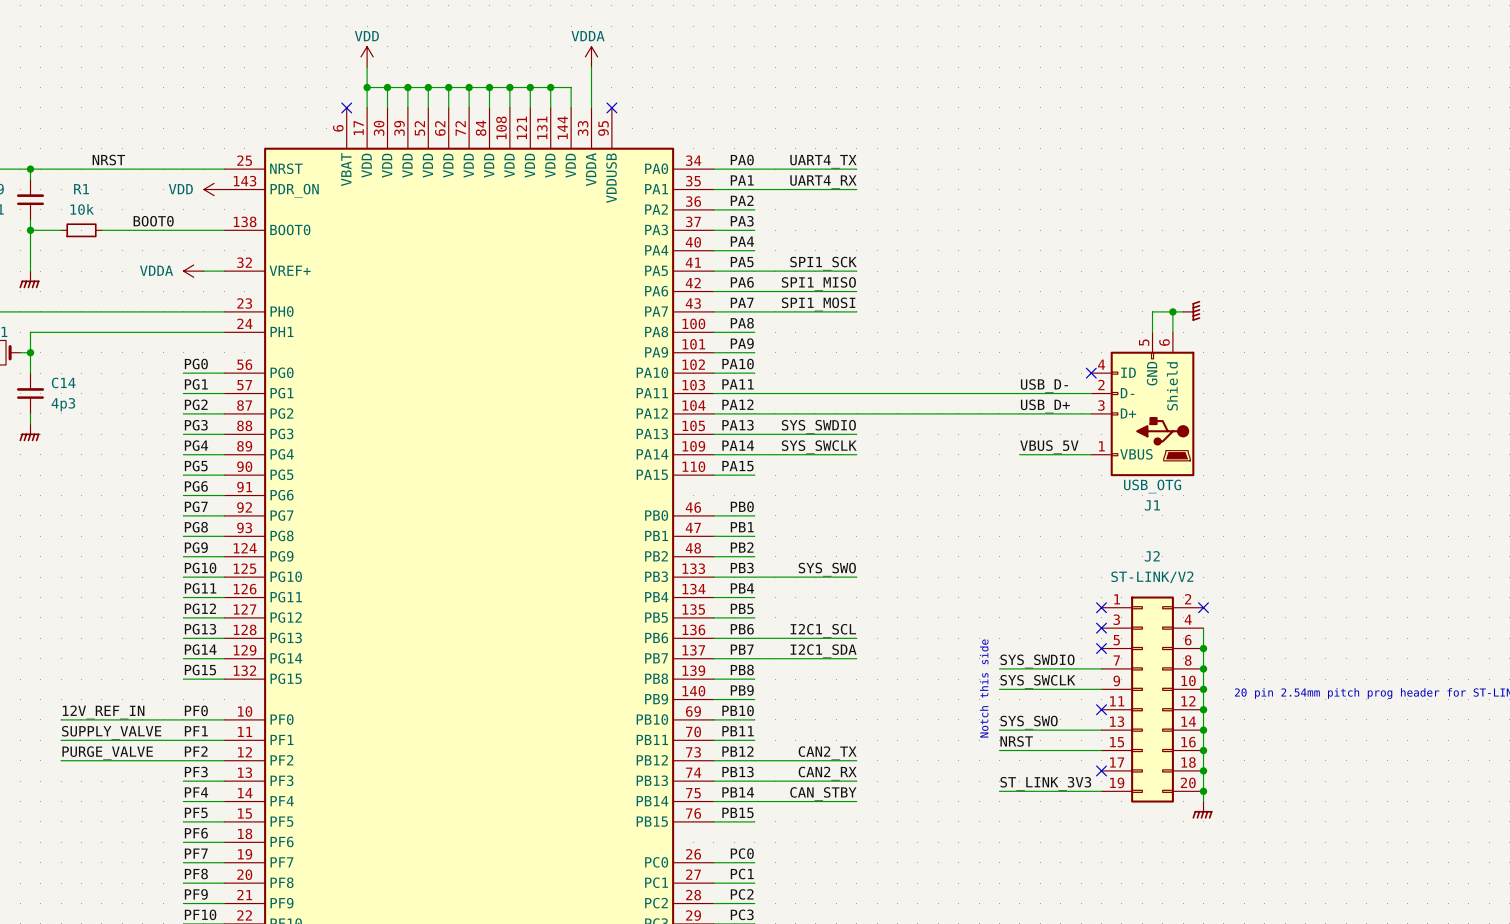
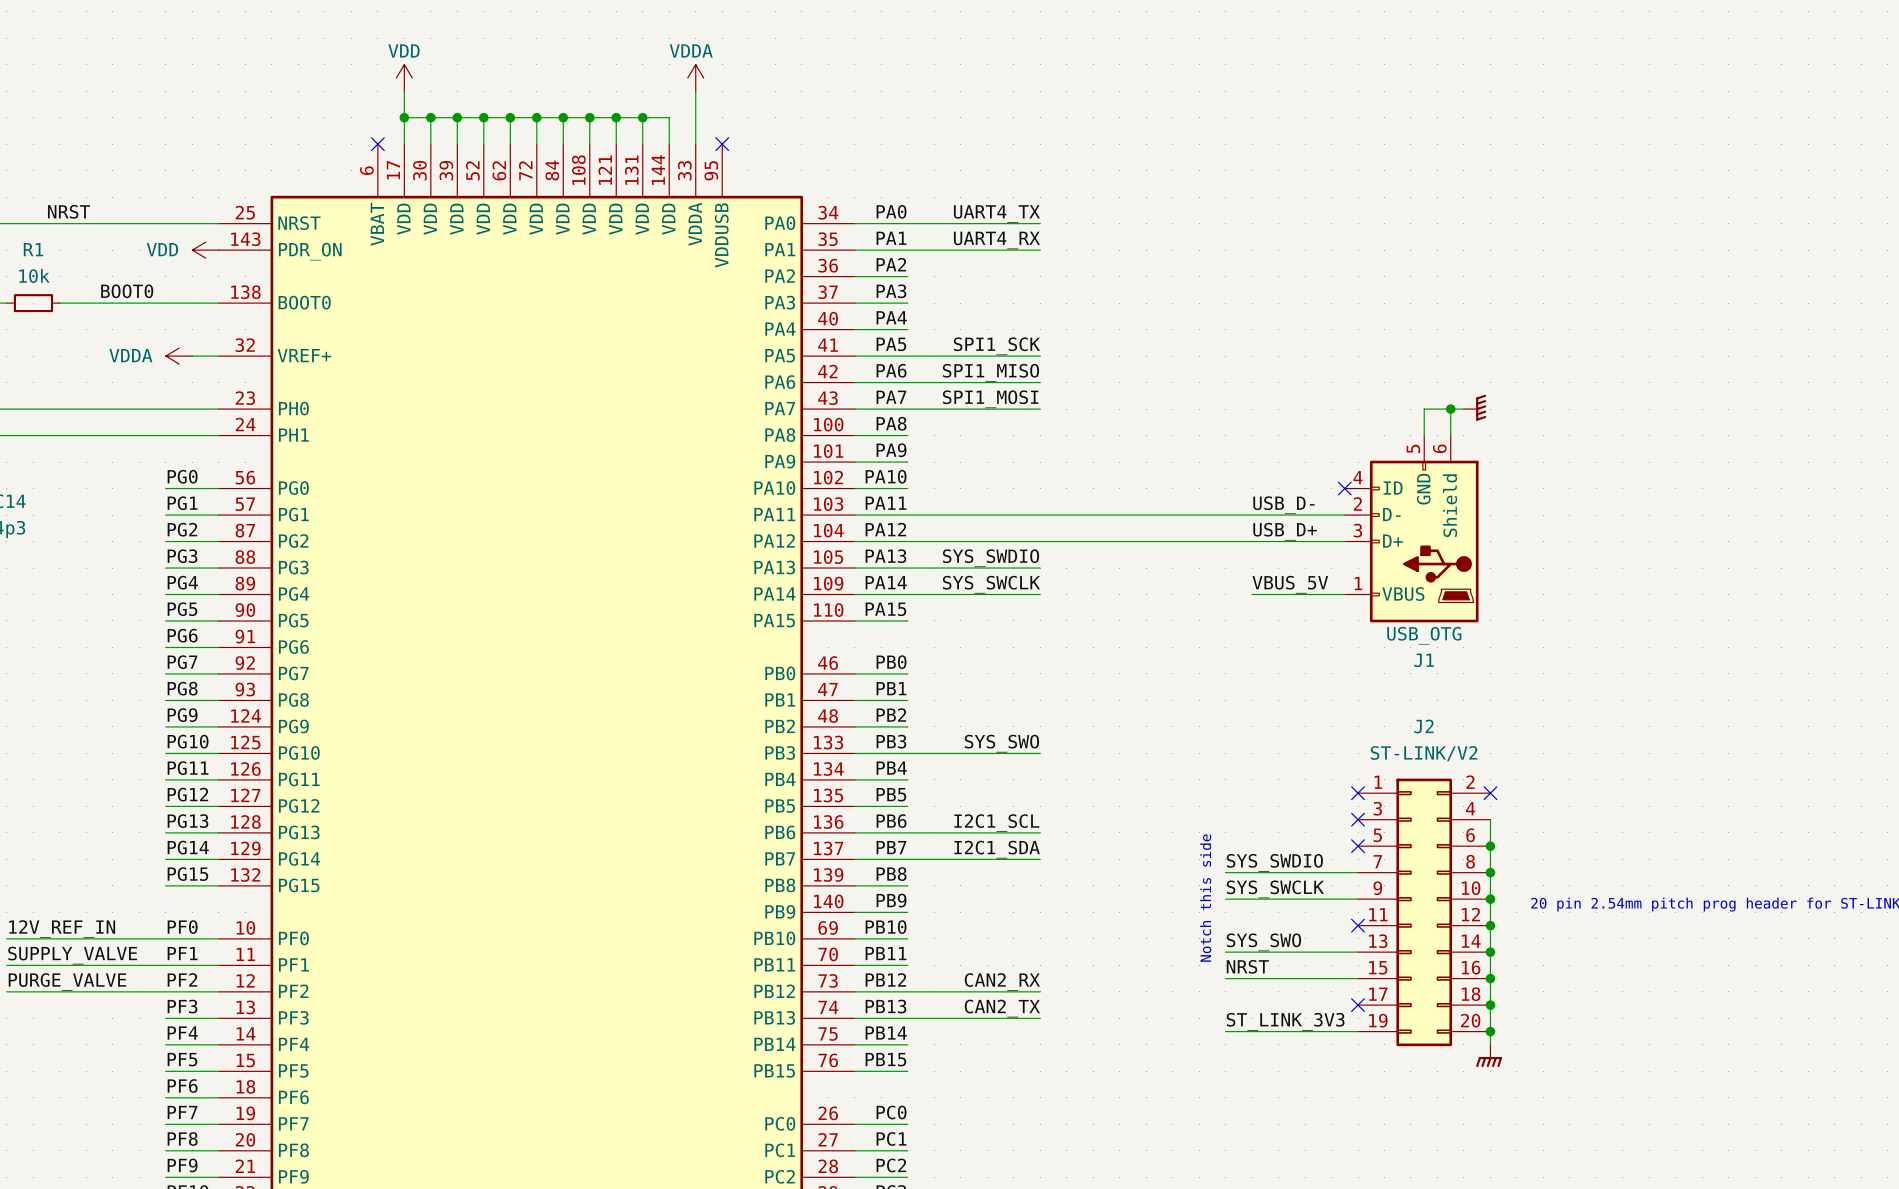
label: CAN2_TX (827, 753) -> CAN2_RX (1002, 982)
label: CAN2_RX (827, 773) -> CAN2_TX (1002, 1008)
label: CAN_STBY (823, 793) -> none
wire: (754, 801) (856, 801) -> none

